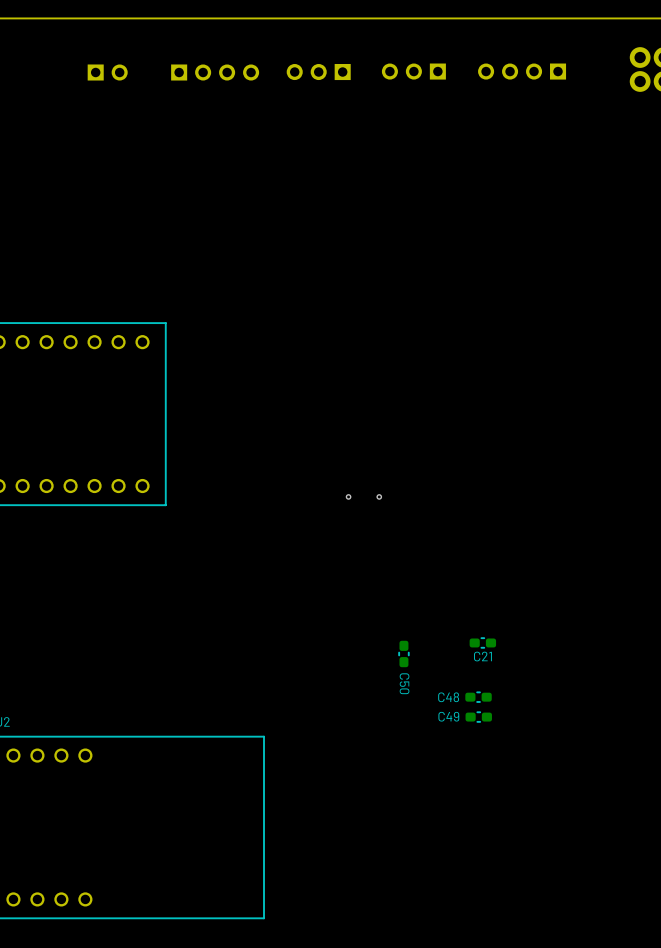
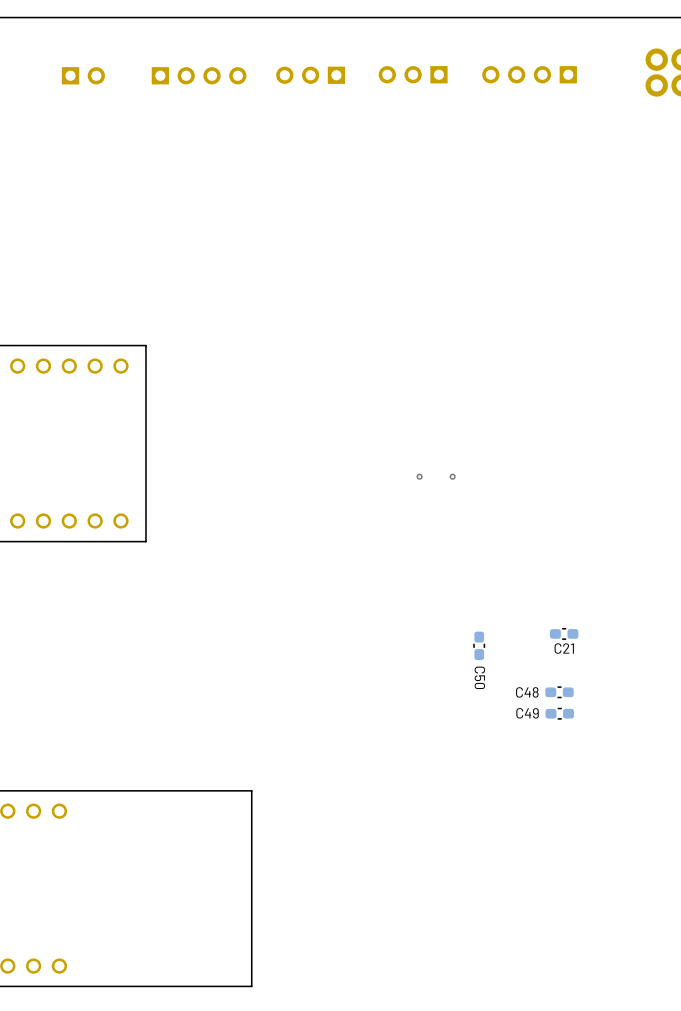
via: none -> (419, 476)
via: none -> (452, 476)
via: (348, 496) -> none
via: (379, 496) -> none
C21 position: (482, 642) -> (564, 633)
C50 position: (403, 653) -> (479, 645)
C48 position: (478, 697) -> (559, 692)
C49 position: (478, 717) -> (559, 713)

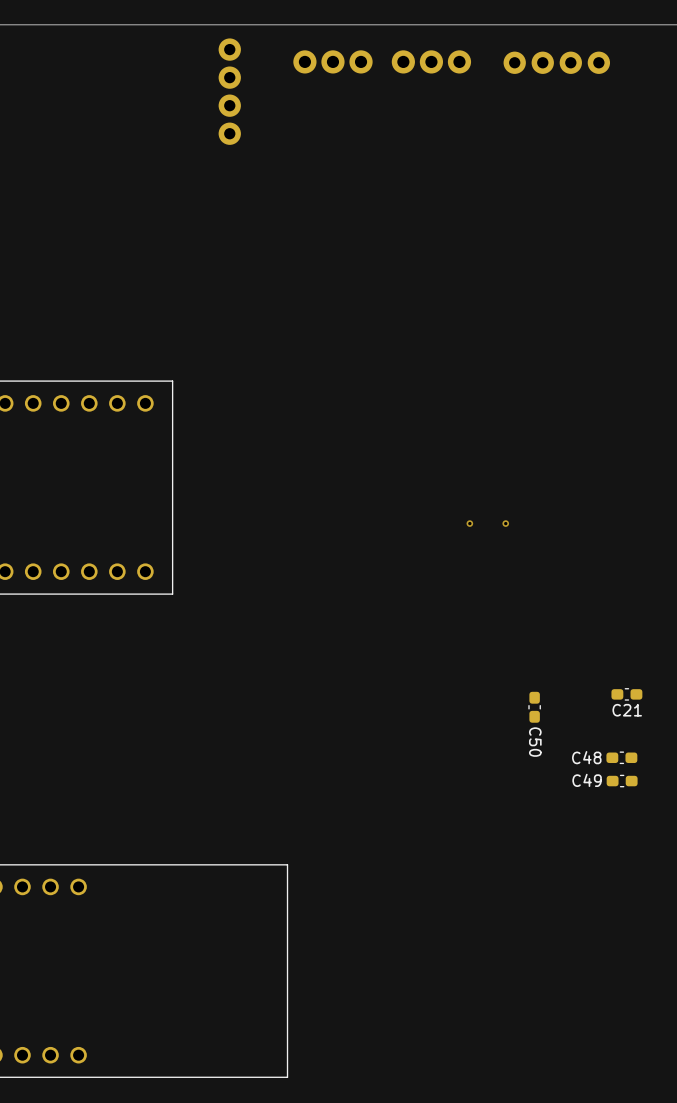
part: none -> (332, 61)
part: none -> (431, 61)
part: none -> (556, 62)
part footprint: [151, 67, 247, 85] -> [218, 38, 241, 145]
part: (413, 74) -> none
part: (529, 74) -> none
part: (83, 75) -> none
part: (310, 75) -> none

